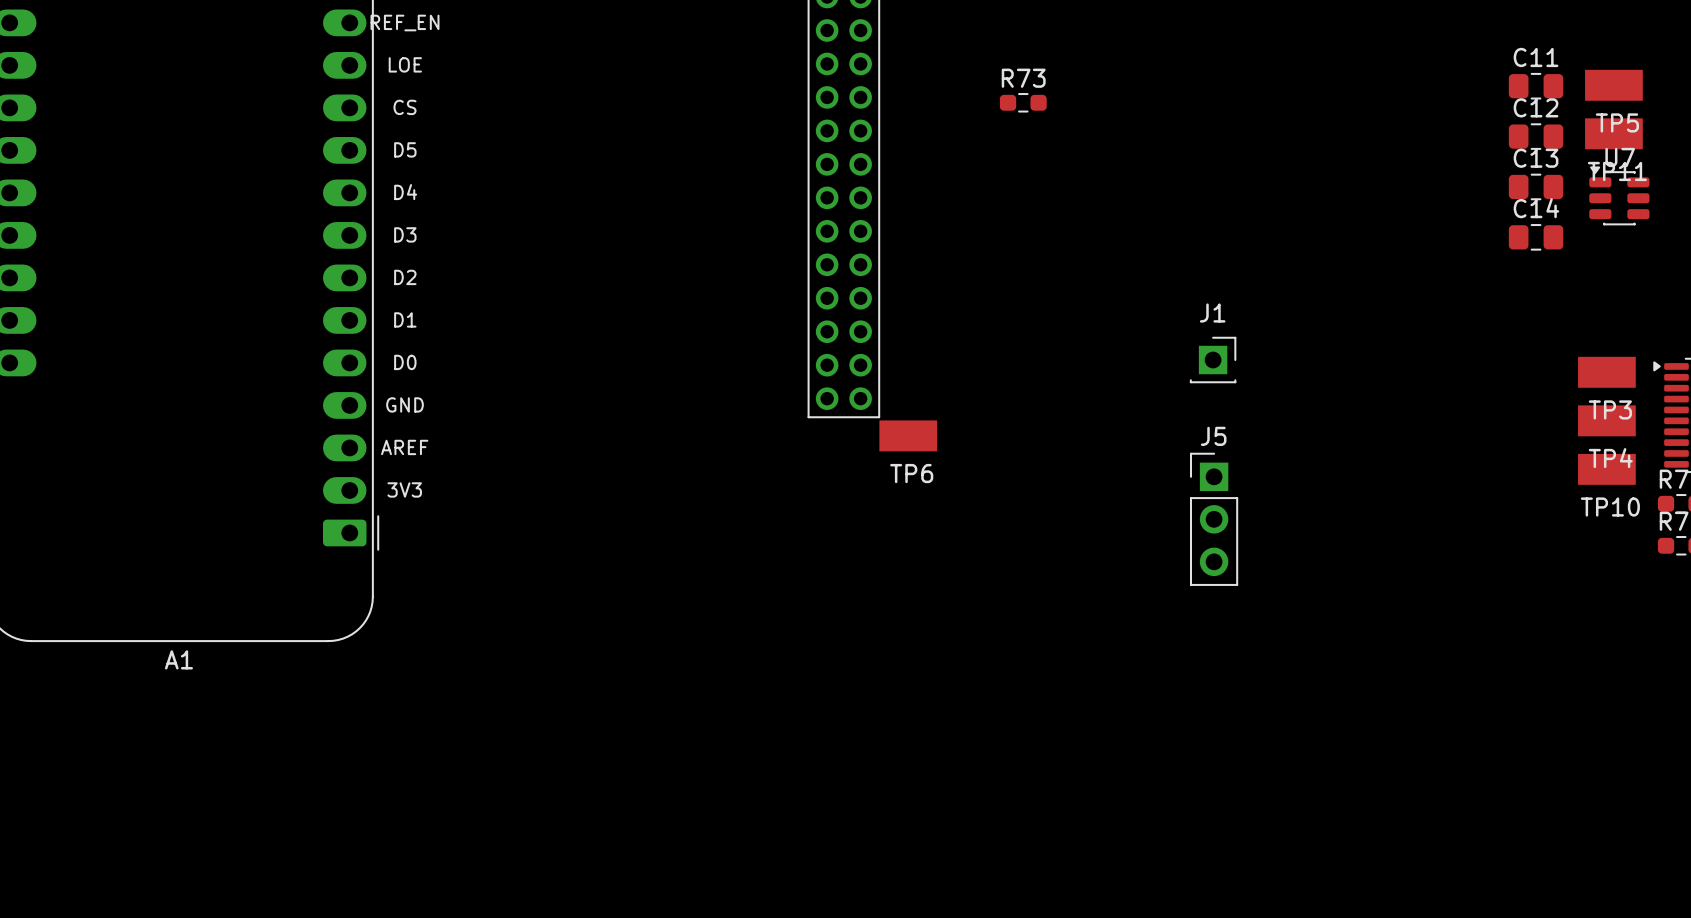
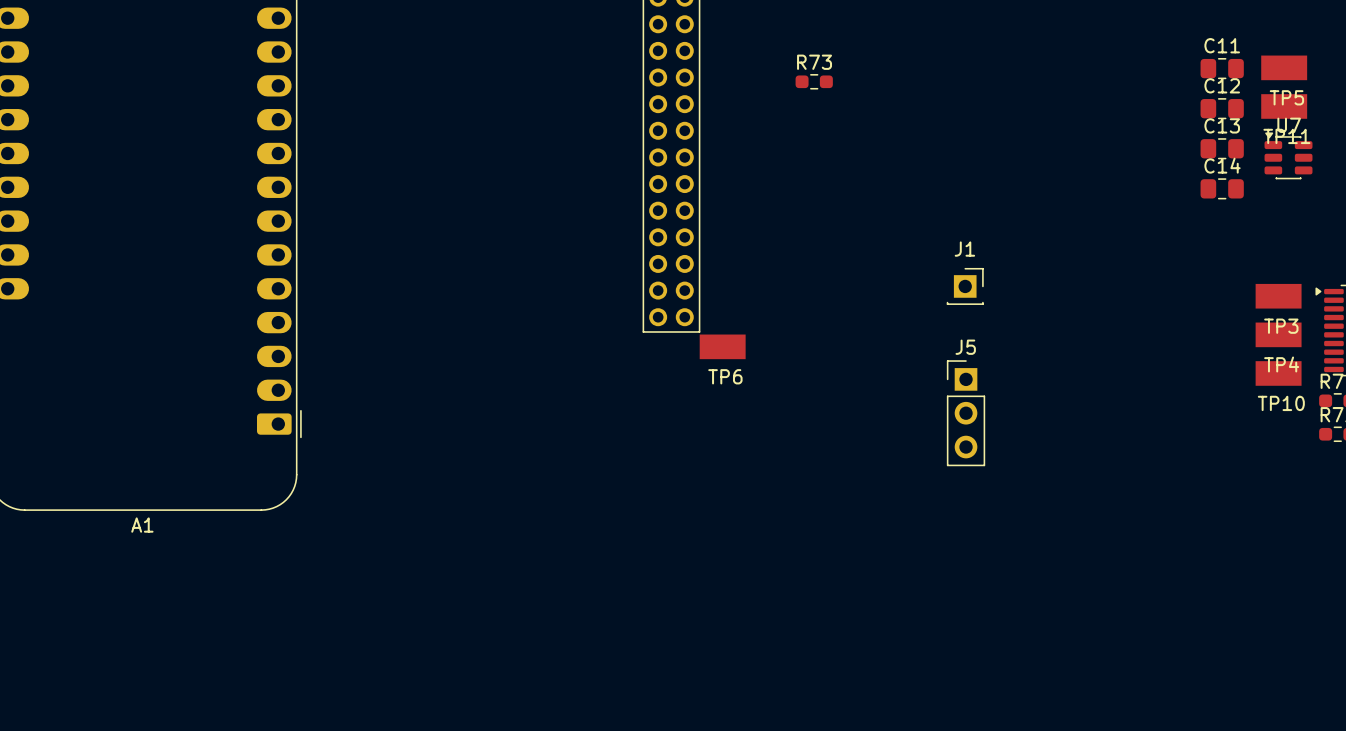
text: REF_EN (405, 23) -> none
text: LOE (405, 64) -> none
text: CS (405, 107) -> none
text: D5 (405, 149) -> none
text: D4 (405, 192) -> none
text: D3 (405, 234) -> none
text: D2 (405, 277) -> none
text: D1 (405, 319) -> none
text: D0 (405, 362) -> none
text: GND (405, 404) -> none
text: AREF (404, 447) -> none
text: 3V3 (404, 489) -> none

